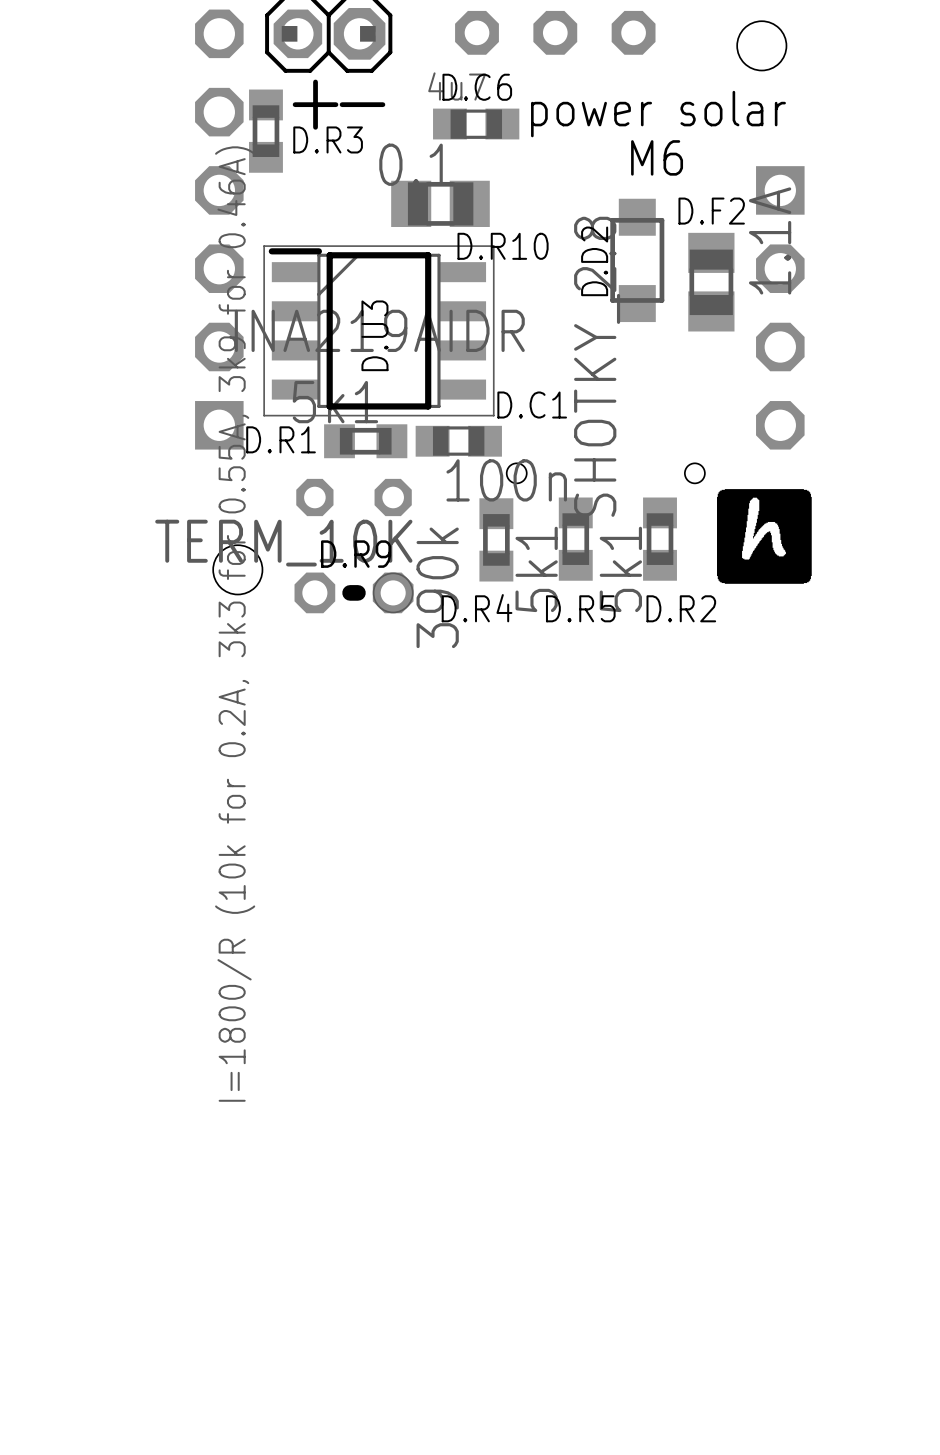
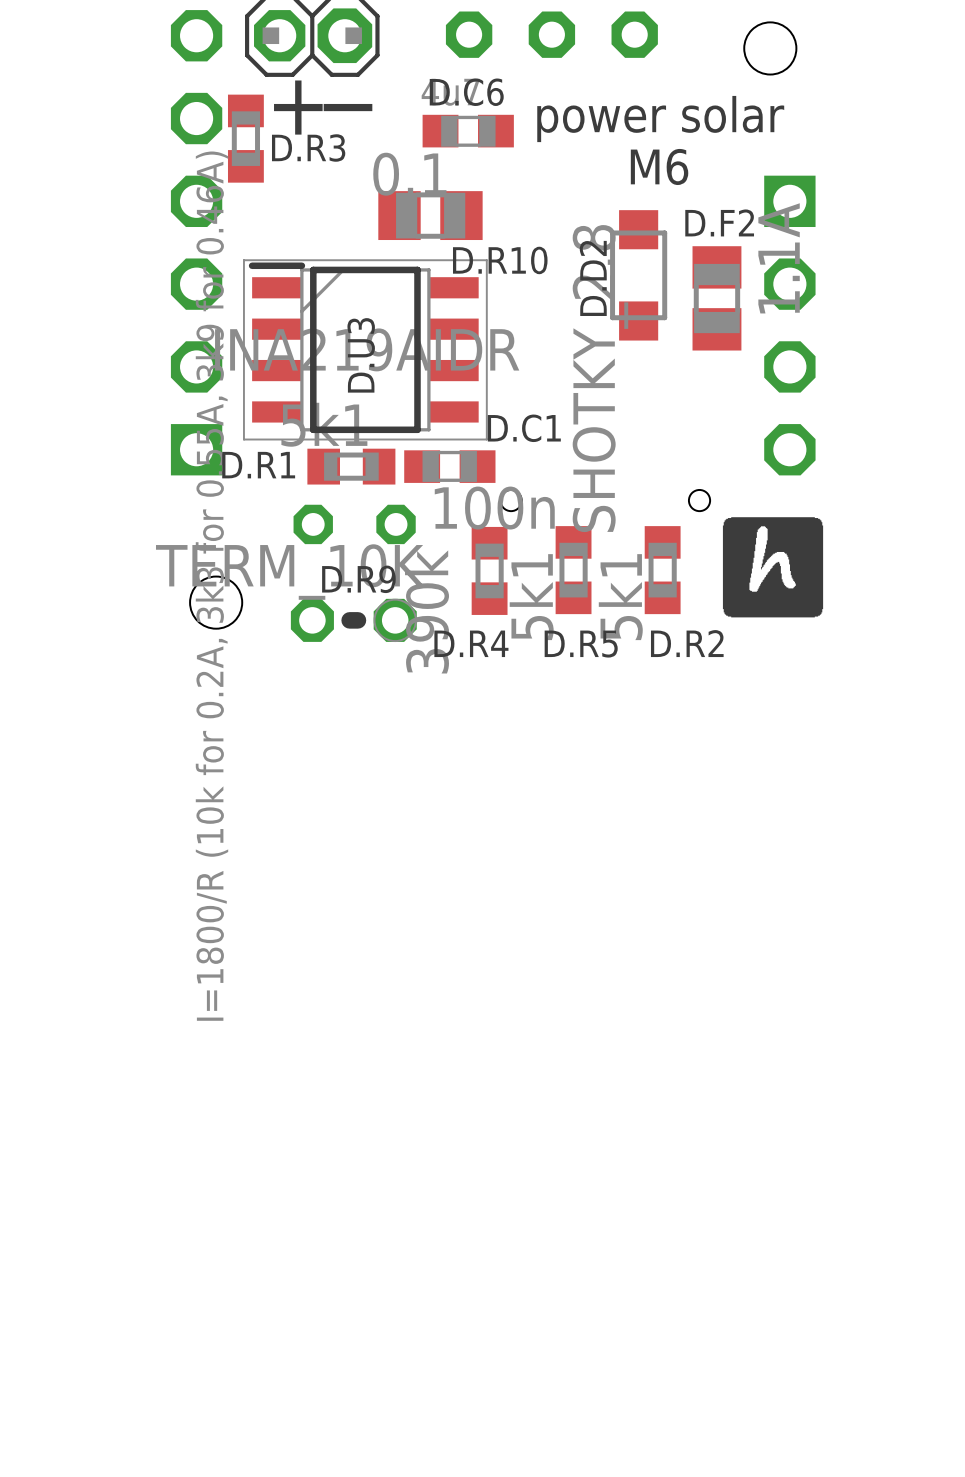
part position: (354, 497) -> (354, 524)
D.R9 position: (354, 592) -> (353, 620)

